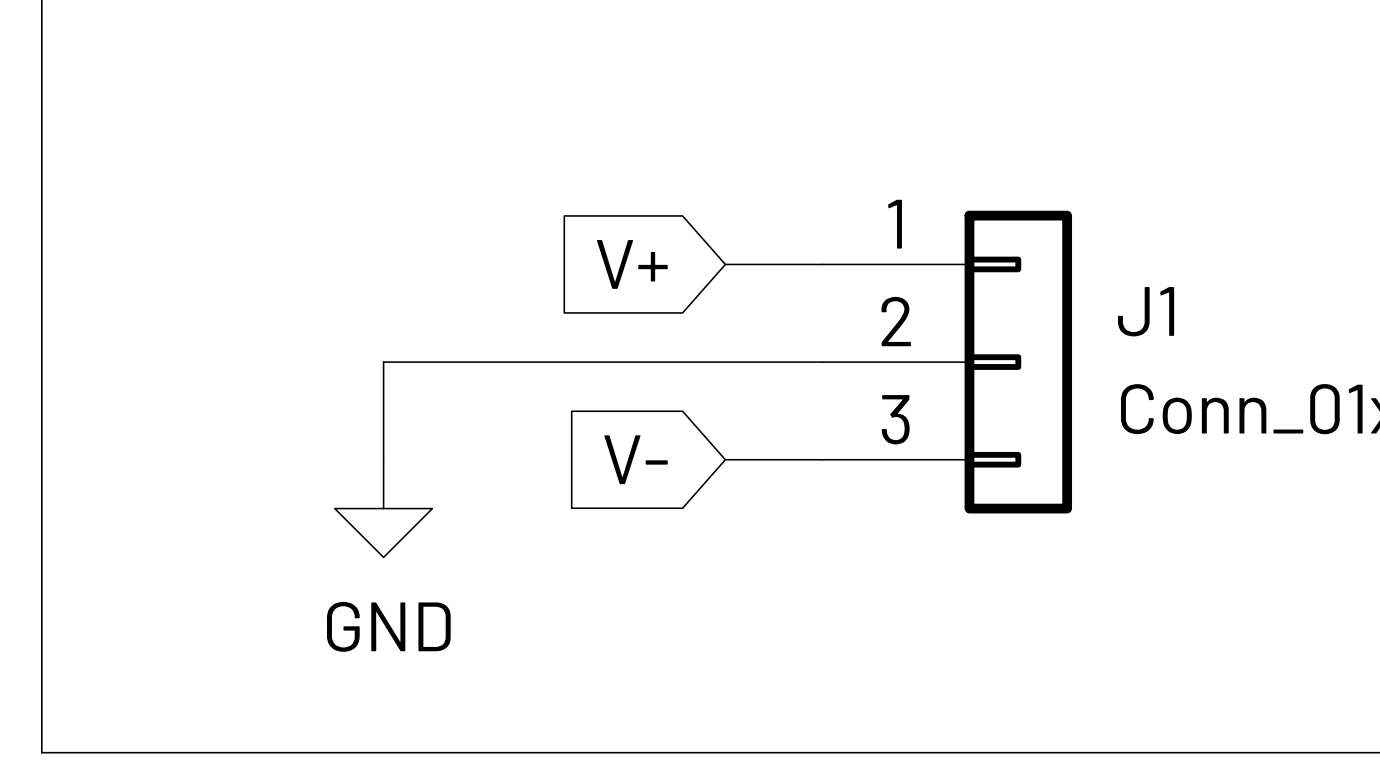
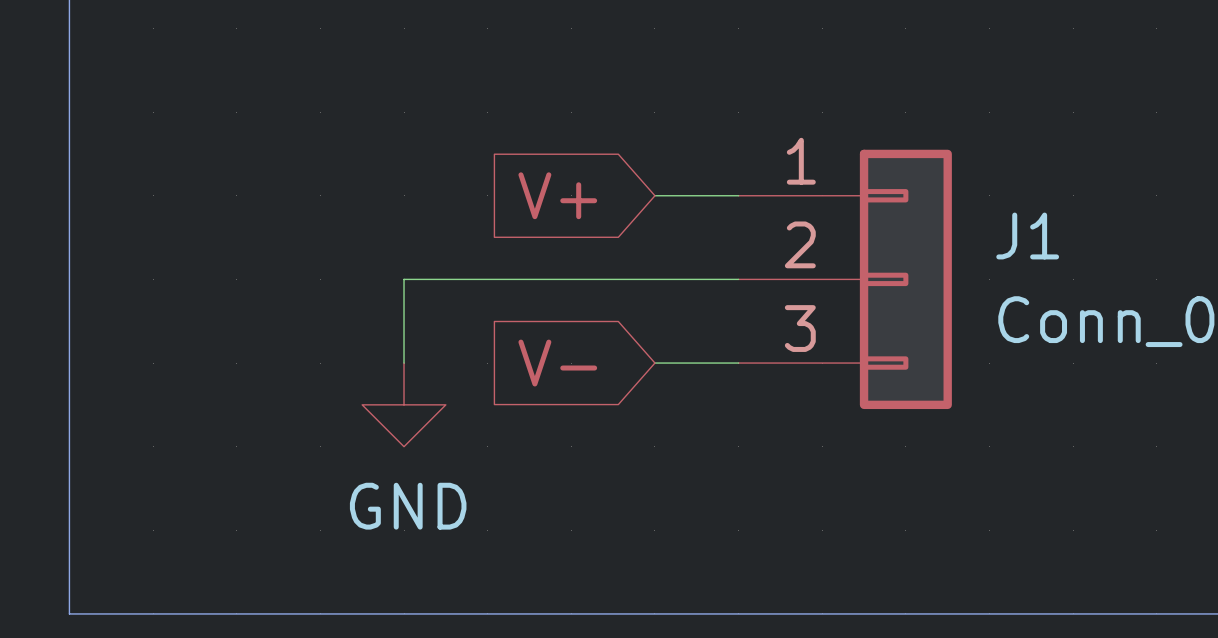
wire: (432, 362) (383, 362) (383, 459) -> (404, 279) (404, 363)
power symbol position: GND (383, 508) -> GND (404, 404)

